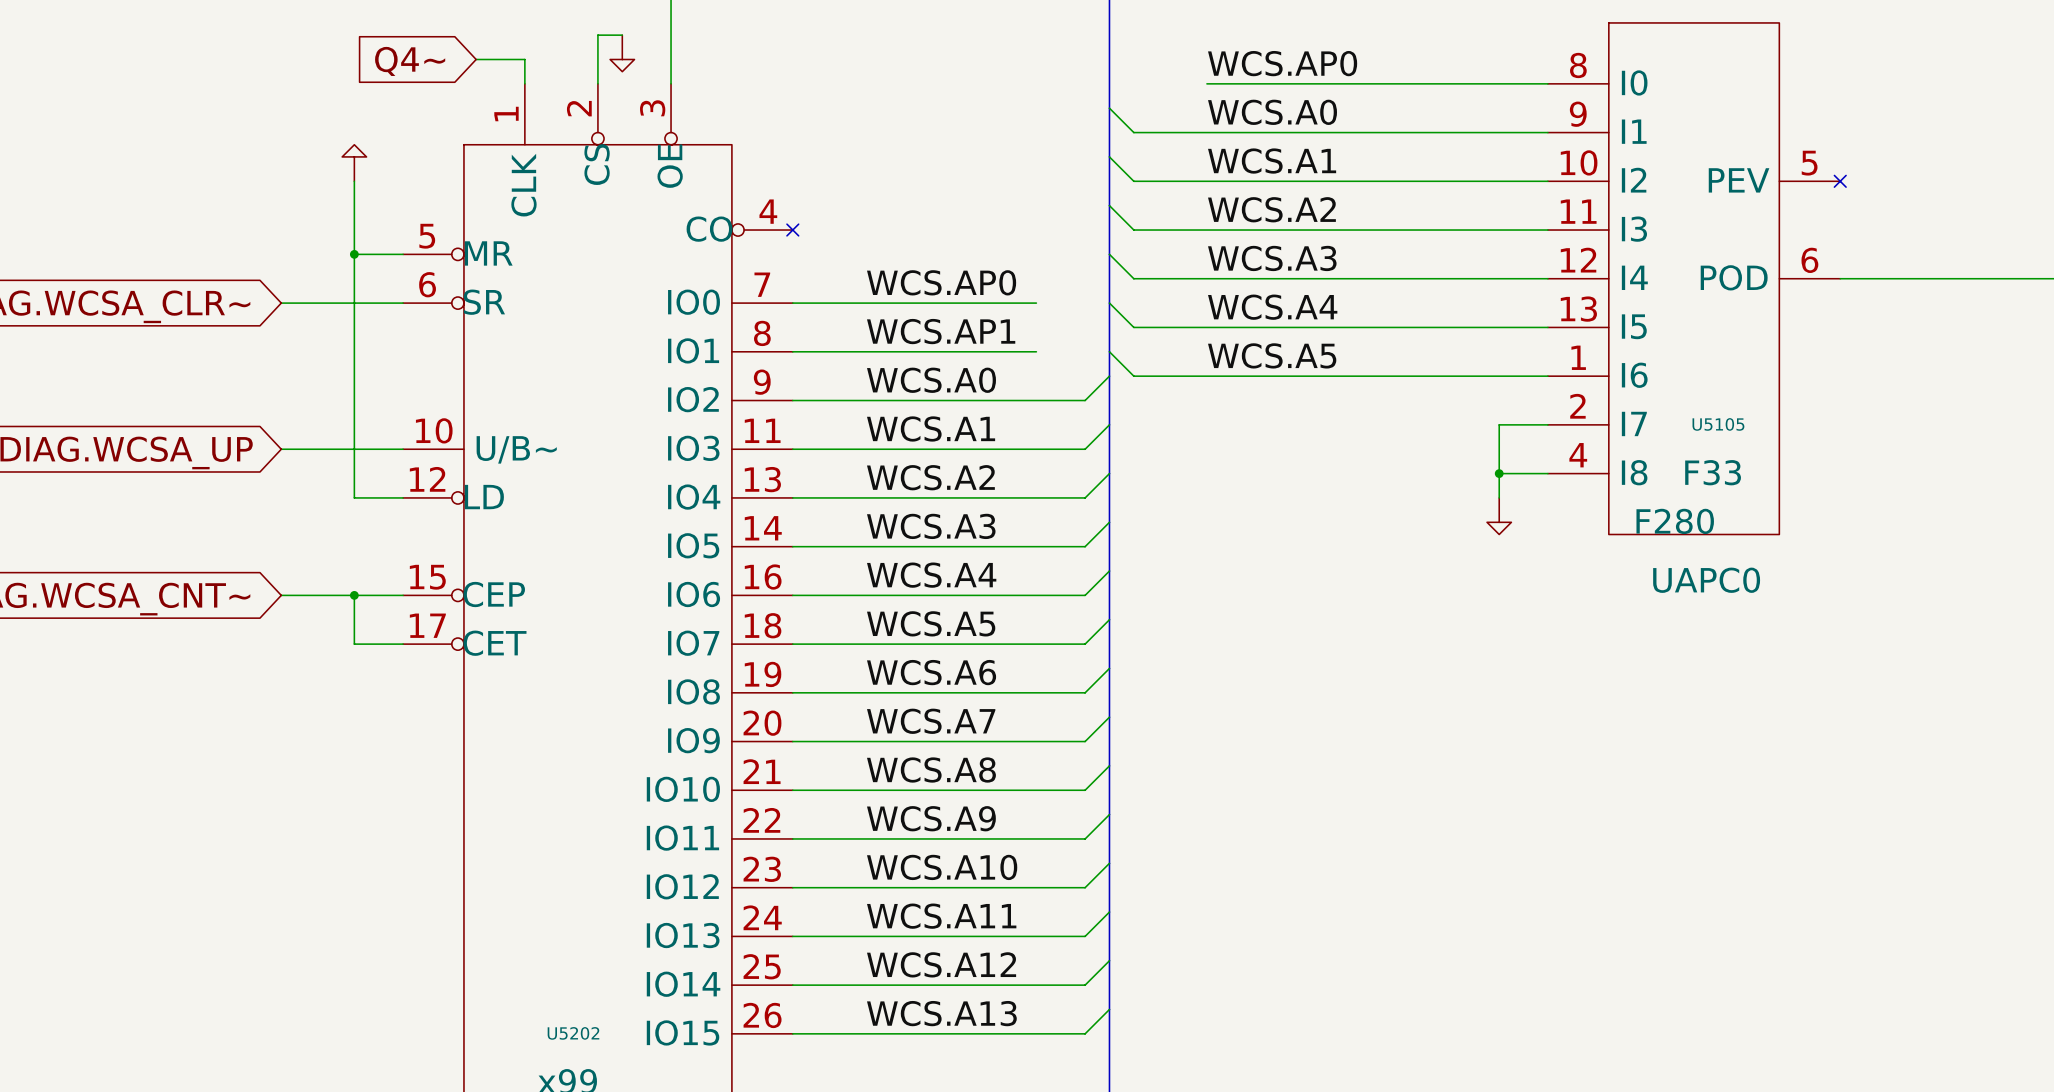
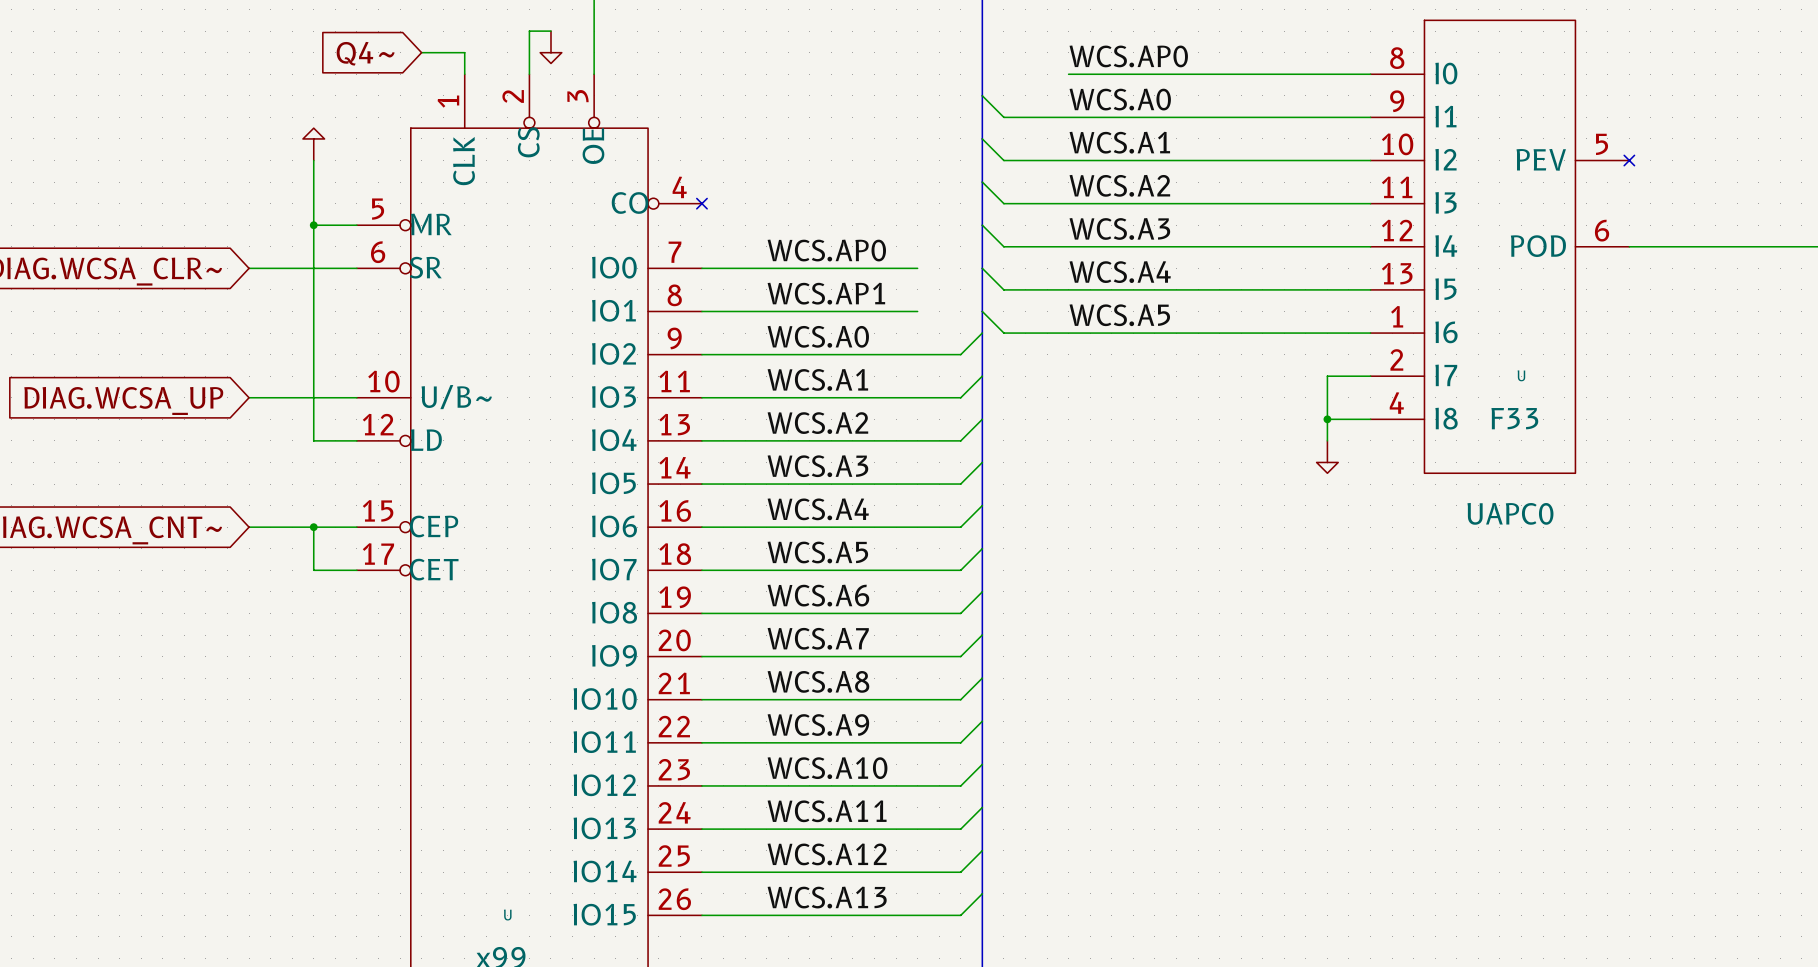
U5105 name: U5105 (1718, 424) -> U (1521, 375)
U5105 value: F280 (1675, 521) -> none
U5202 name: U5202 (573, 1033) -> U (507, 915)

